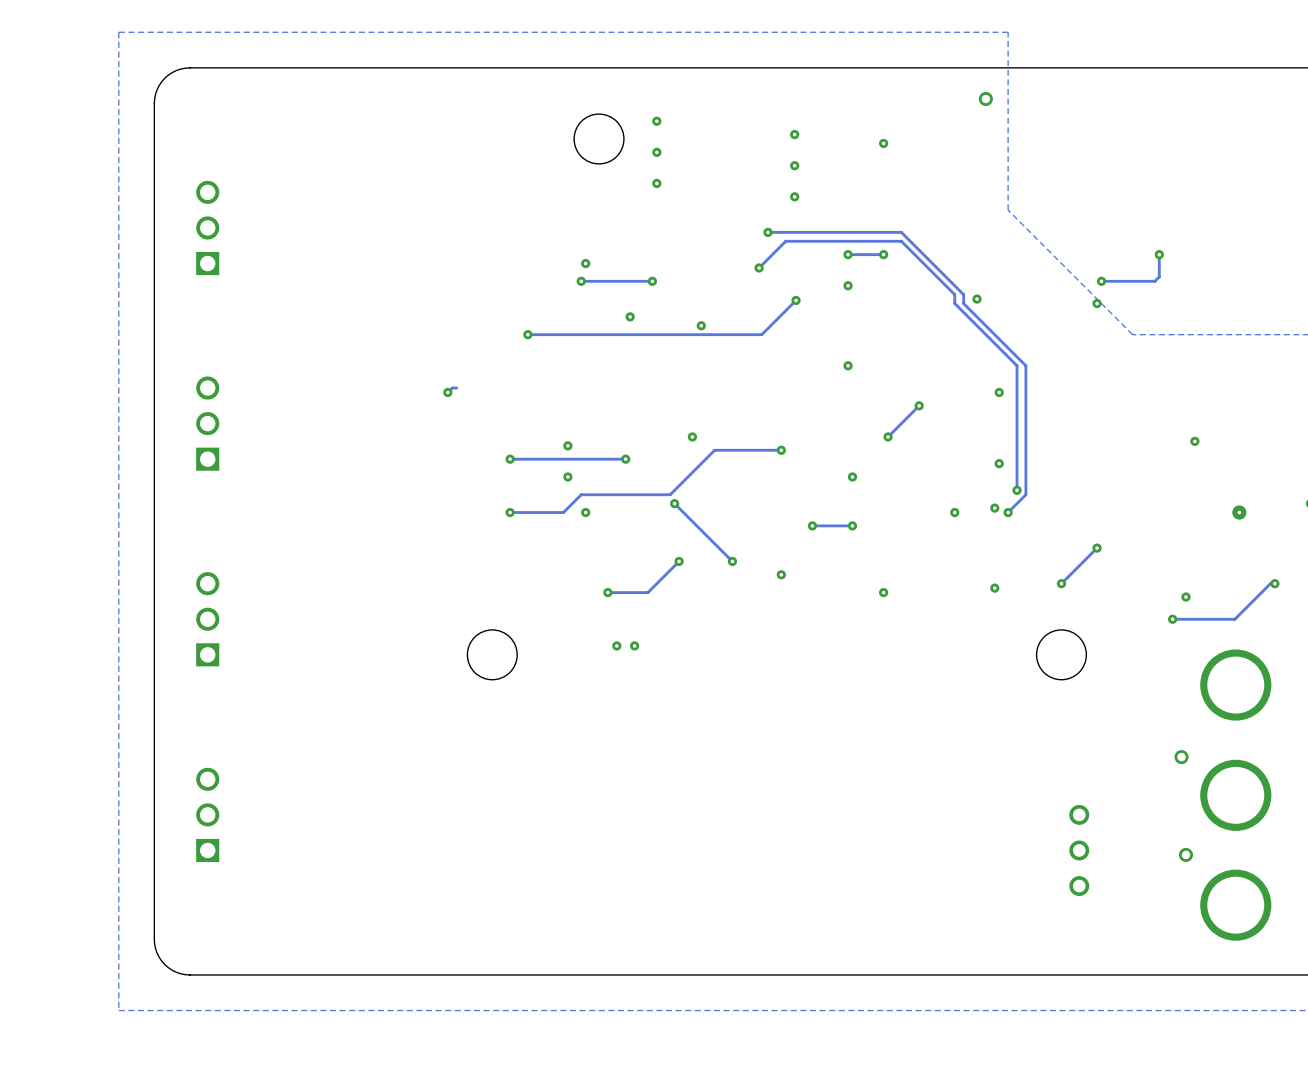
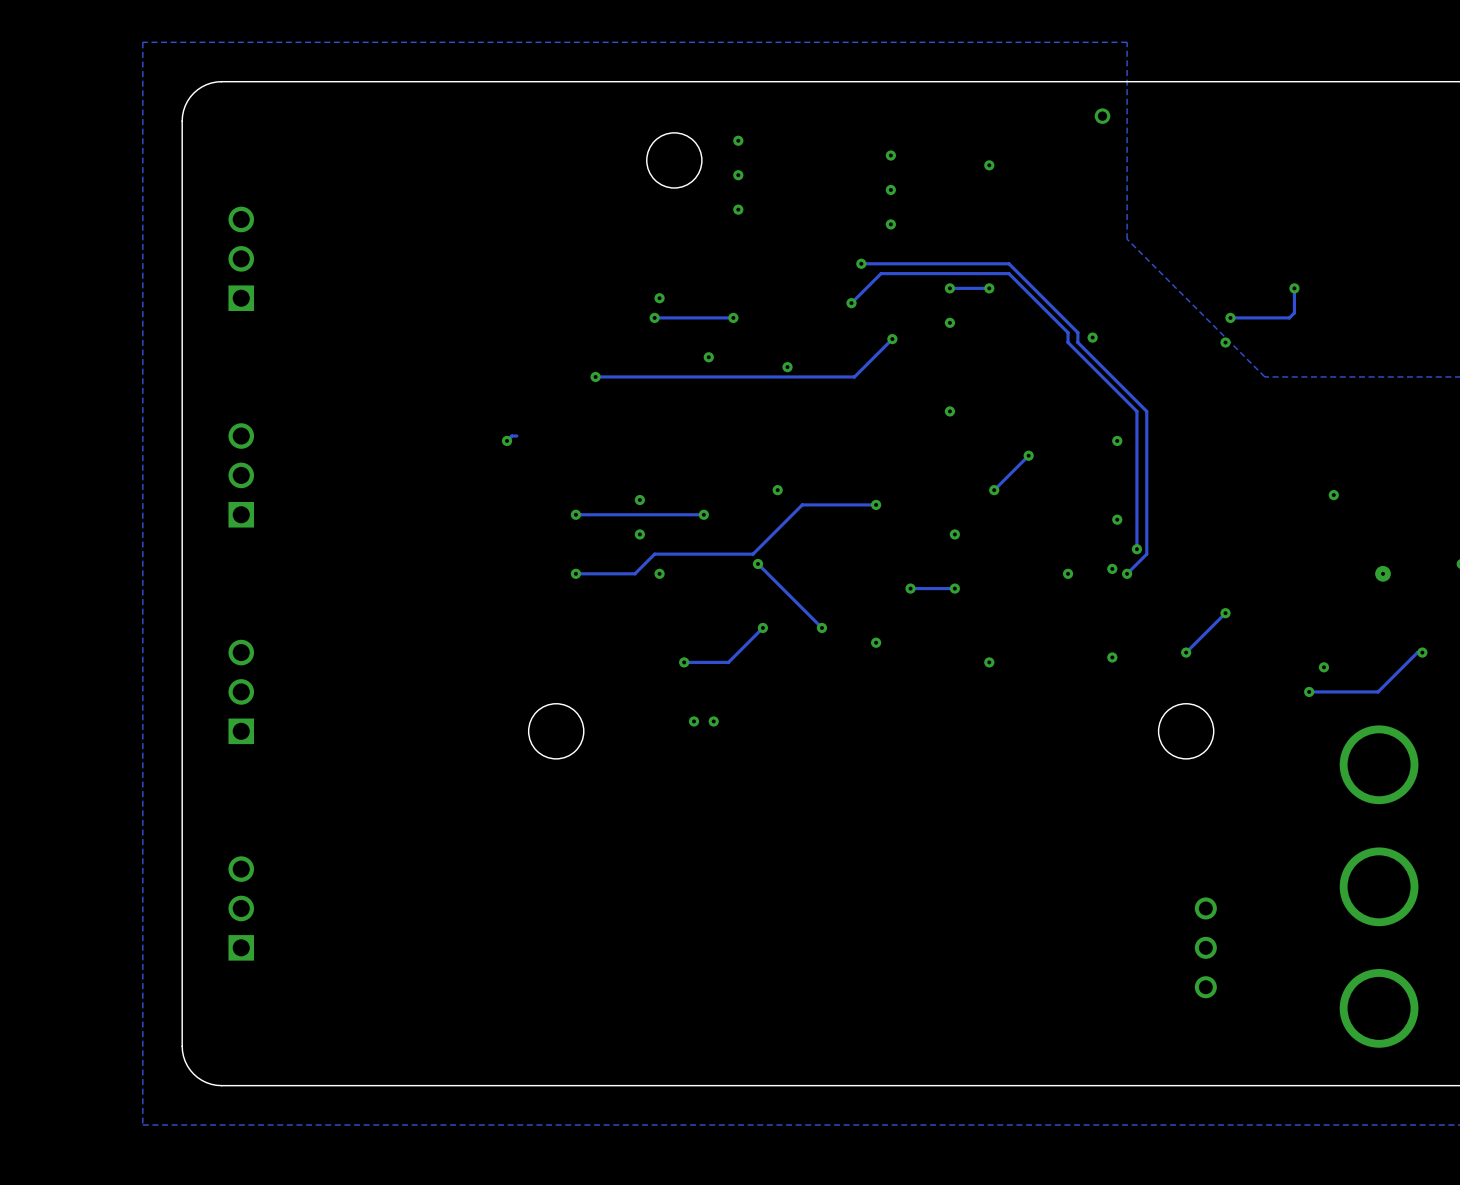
via: (1181, 757) -> none
via: (1185, 854) -> none

